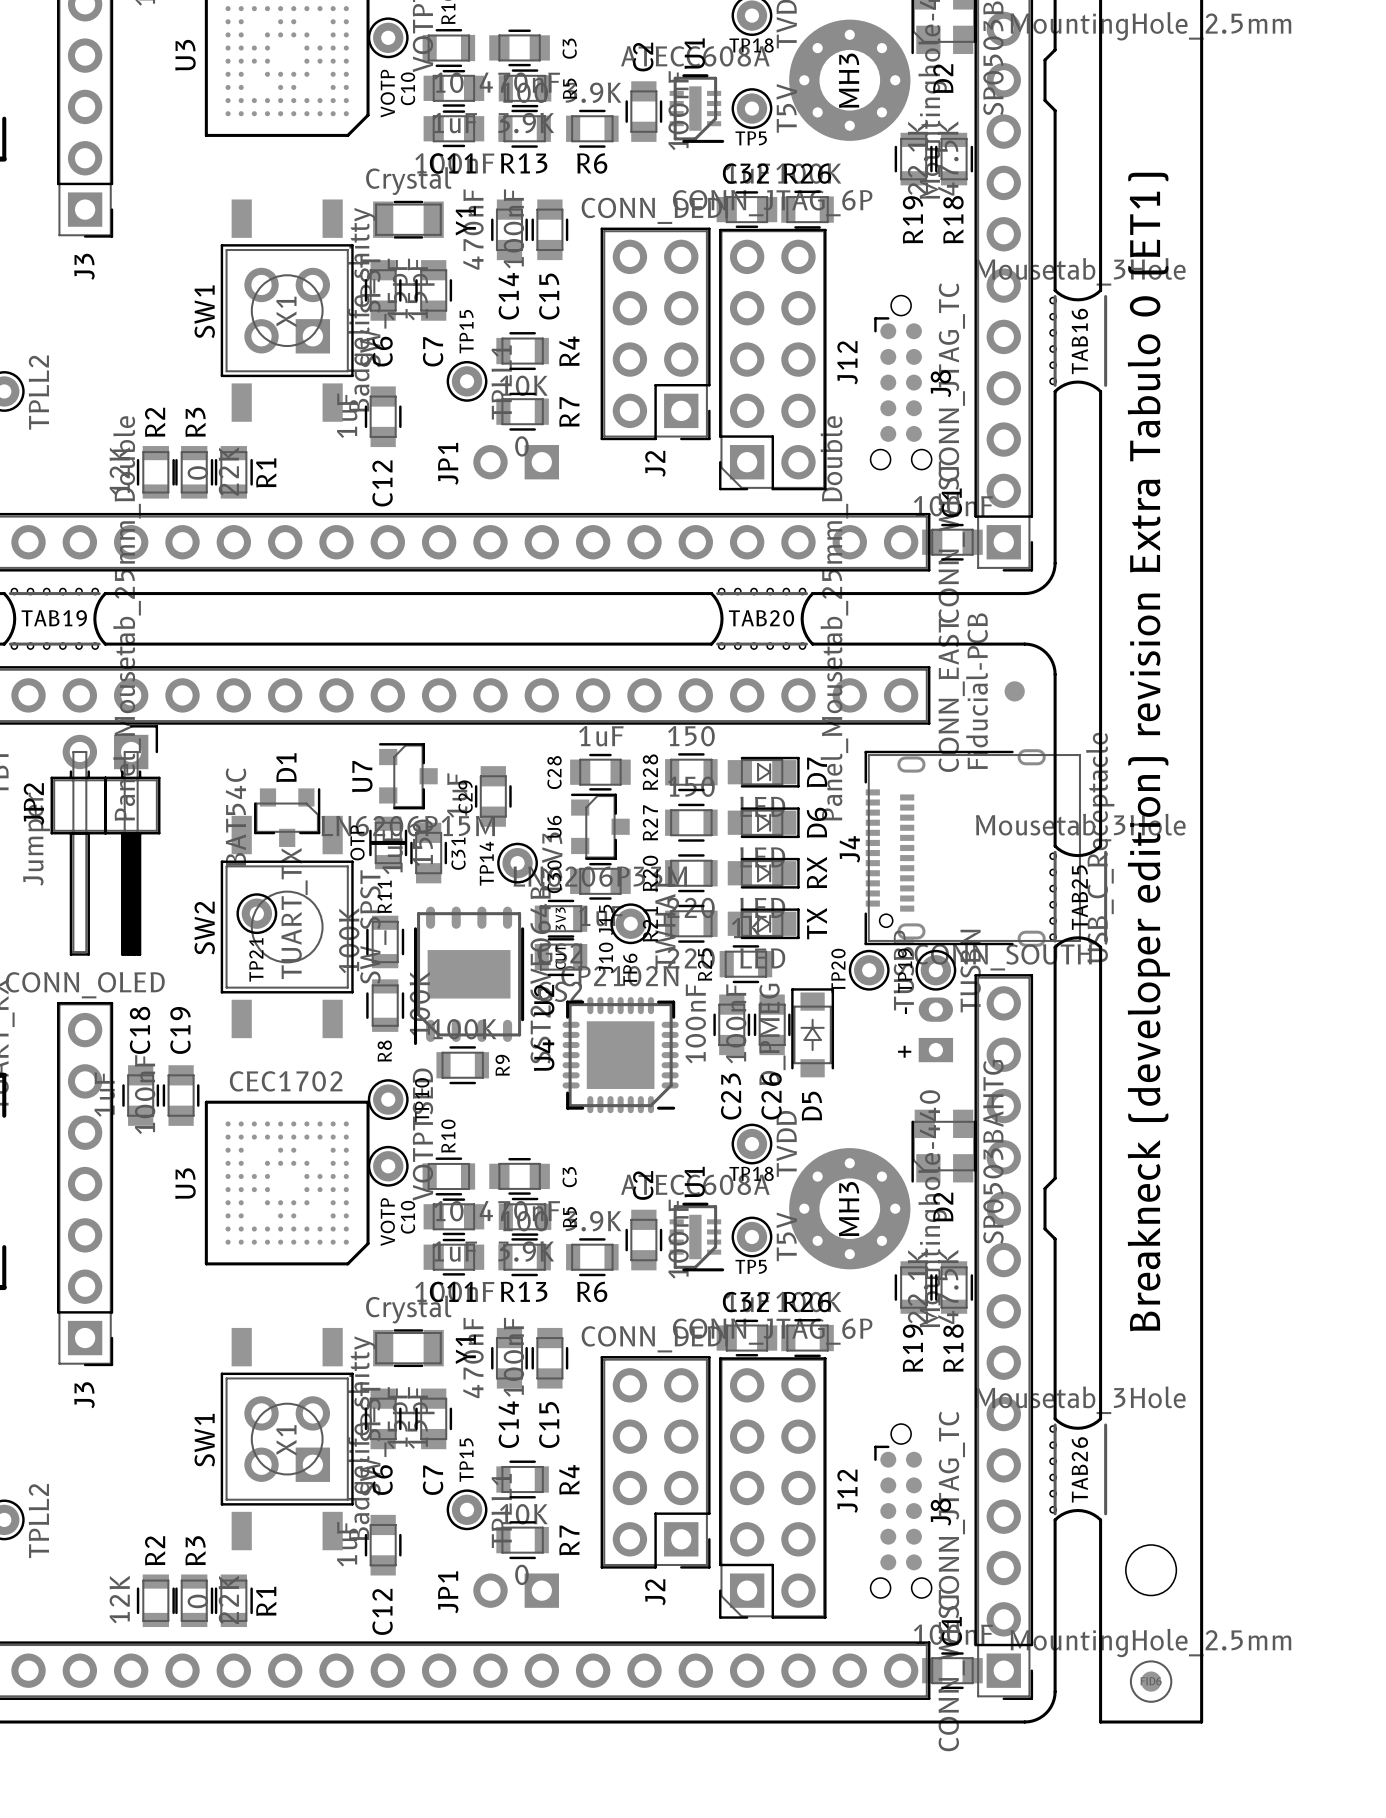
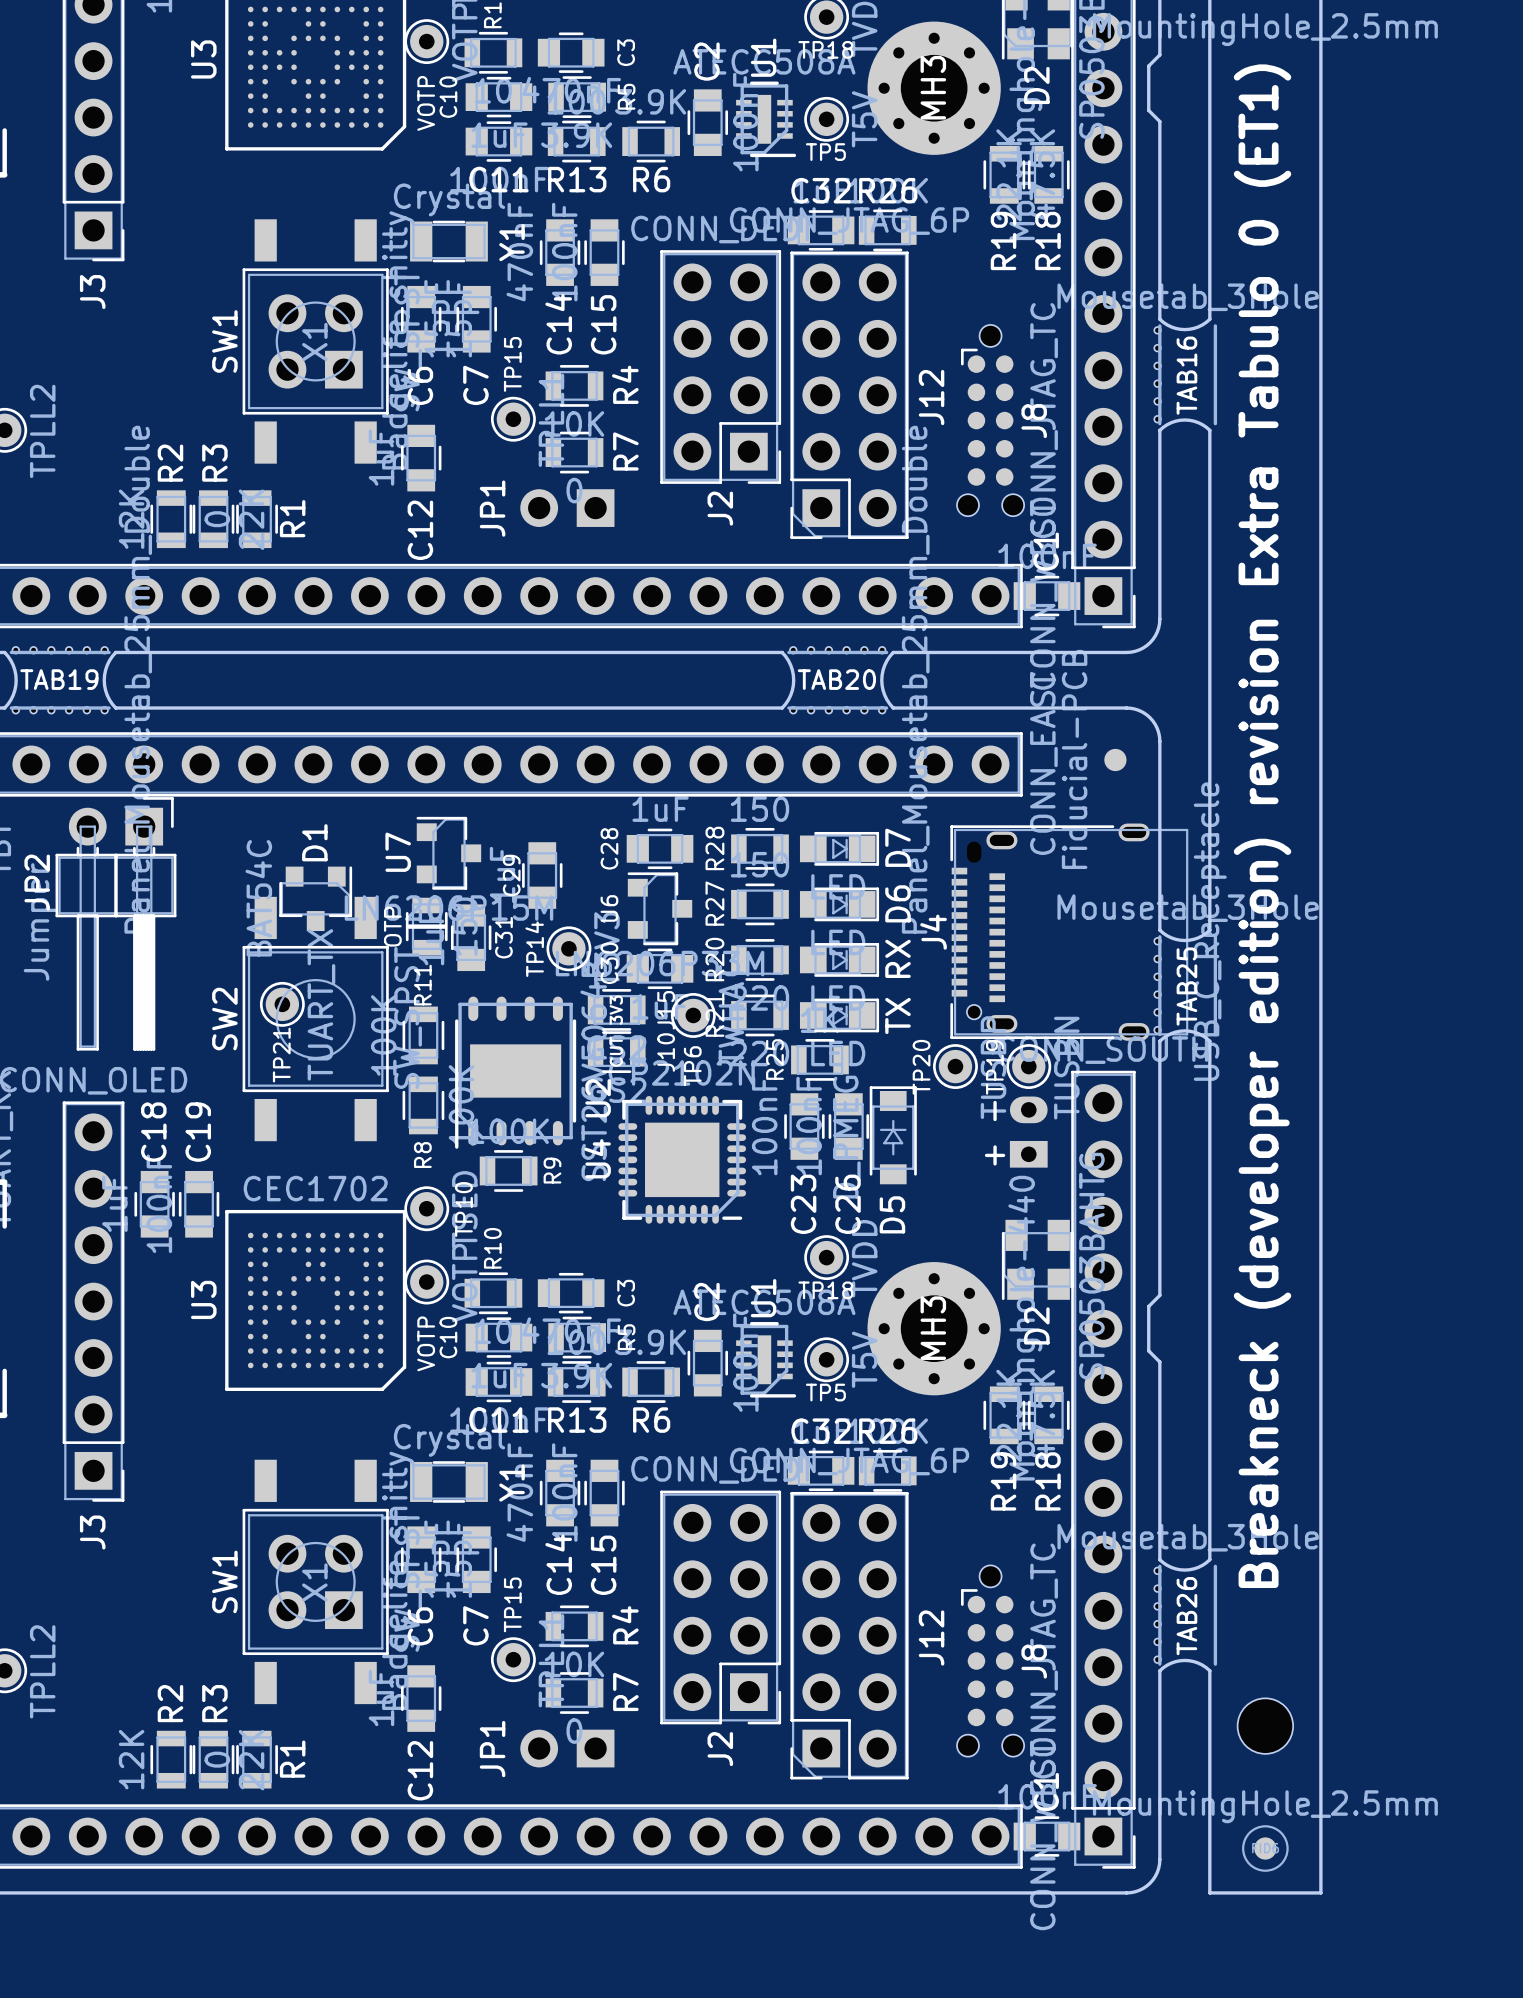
U1 value: ATECC608A (695, 56) -> ATECC508A (764, 61)
U1 value: ATECC608A (695, 1184) -> ATECC508A (764, 1302)

